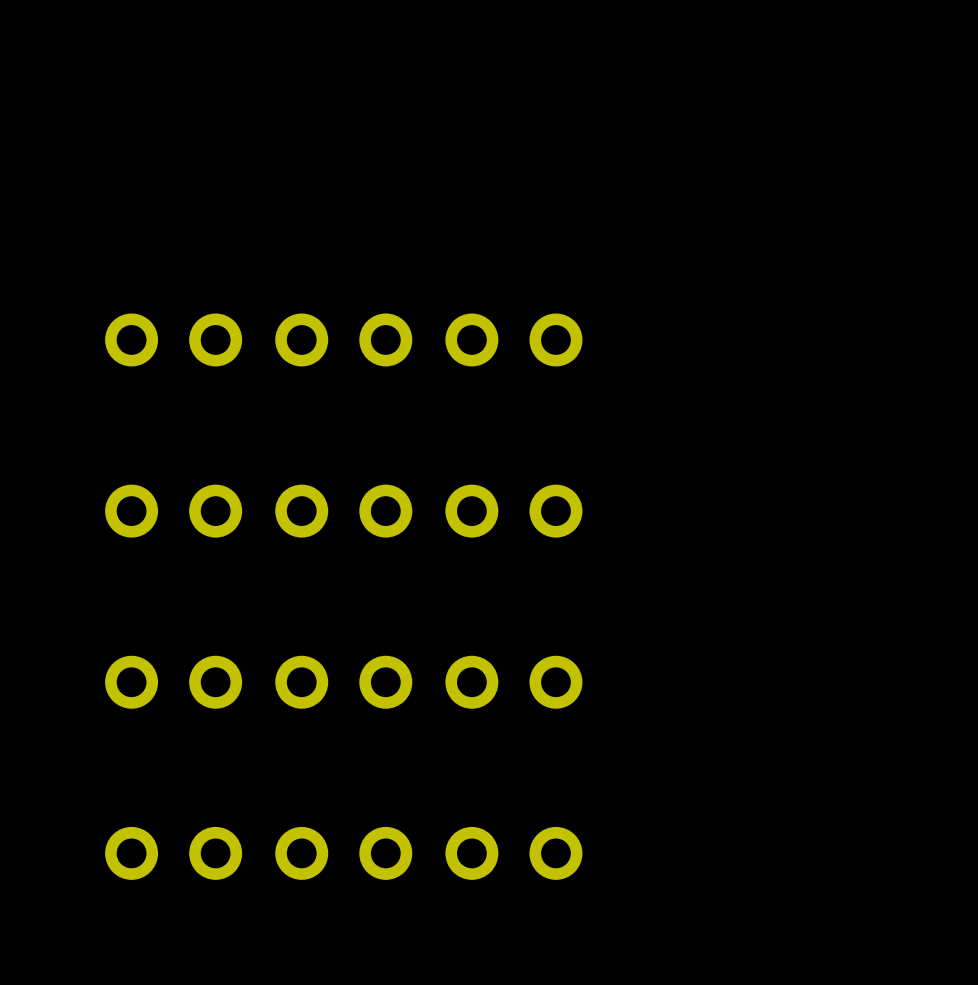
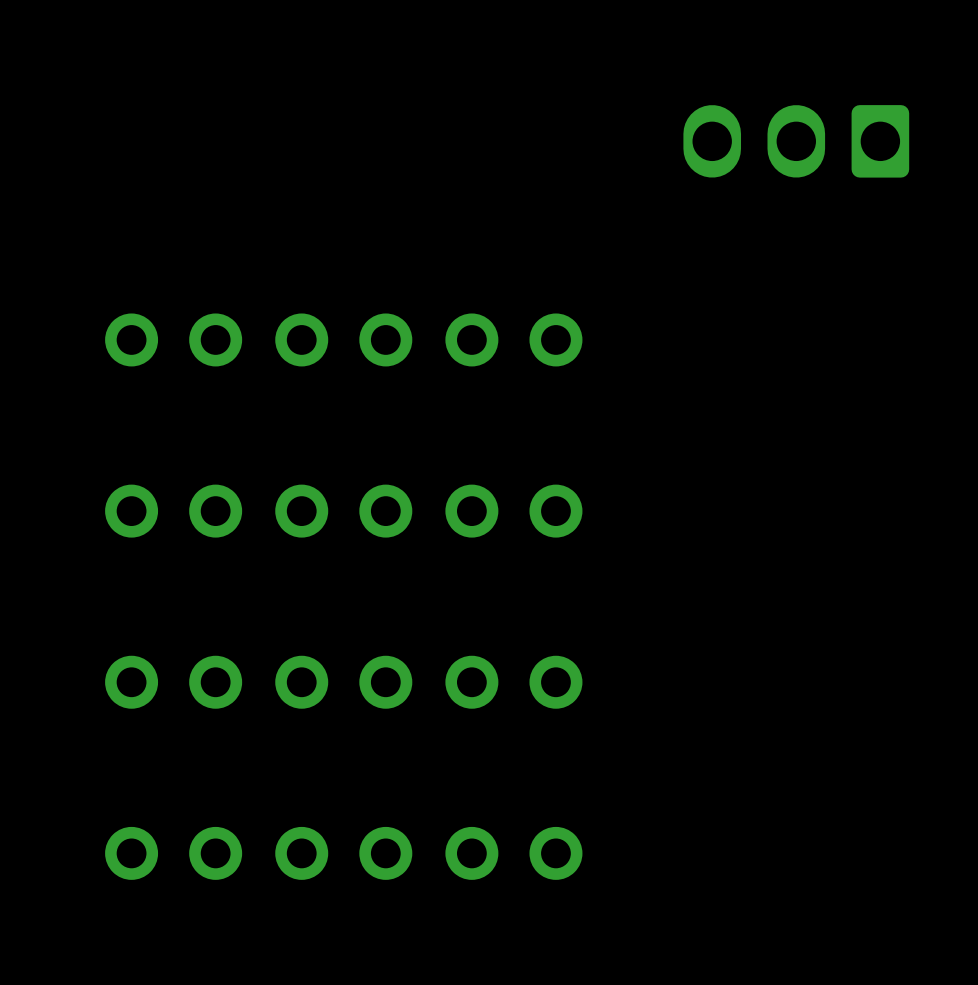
part: none -> (796, 141)

